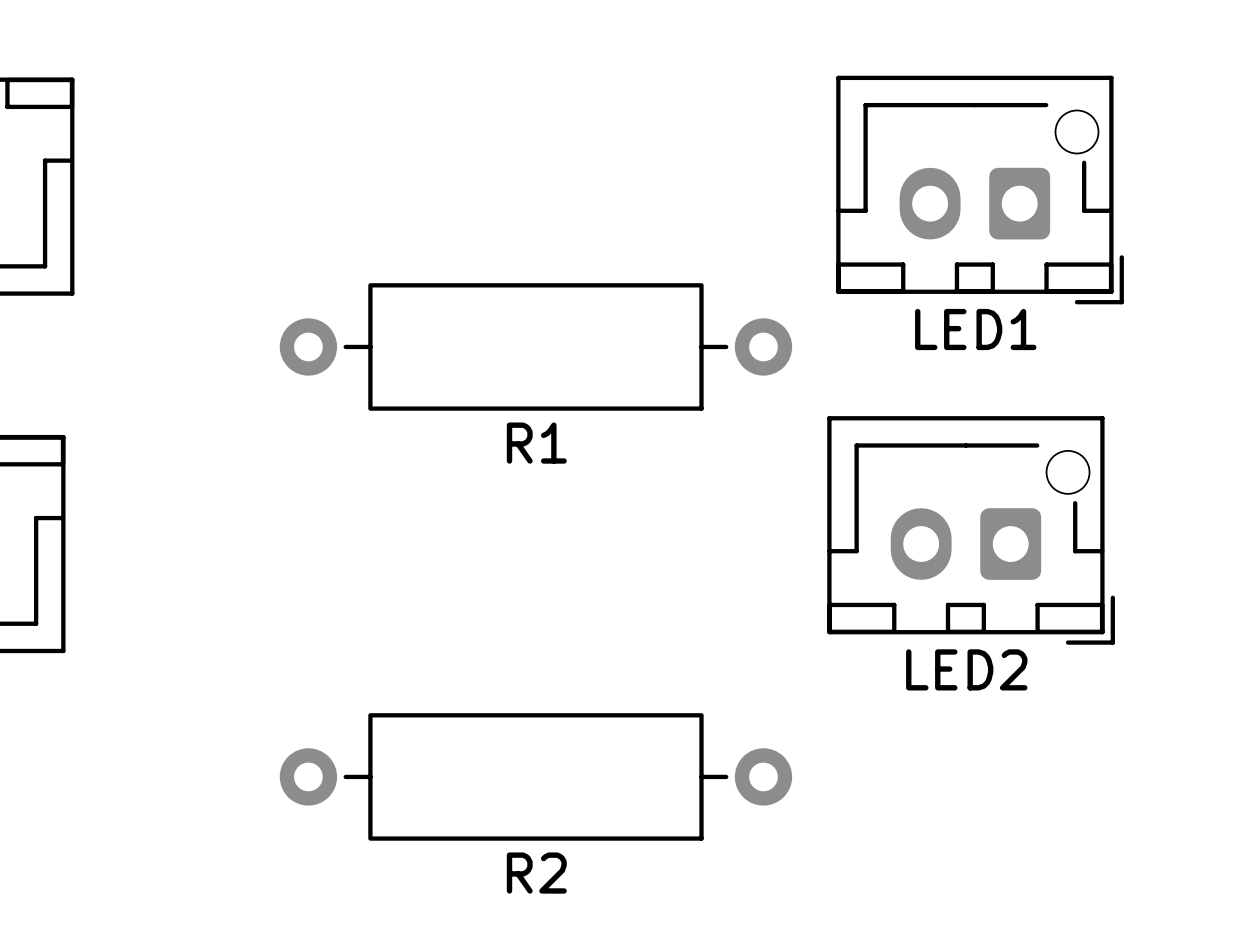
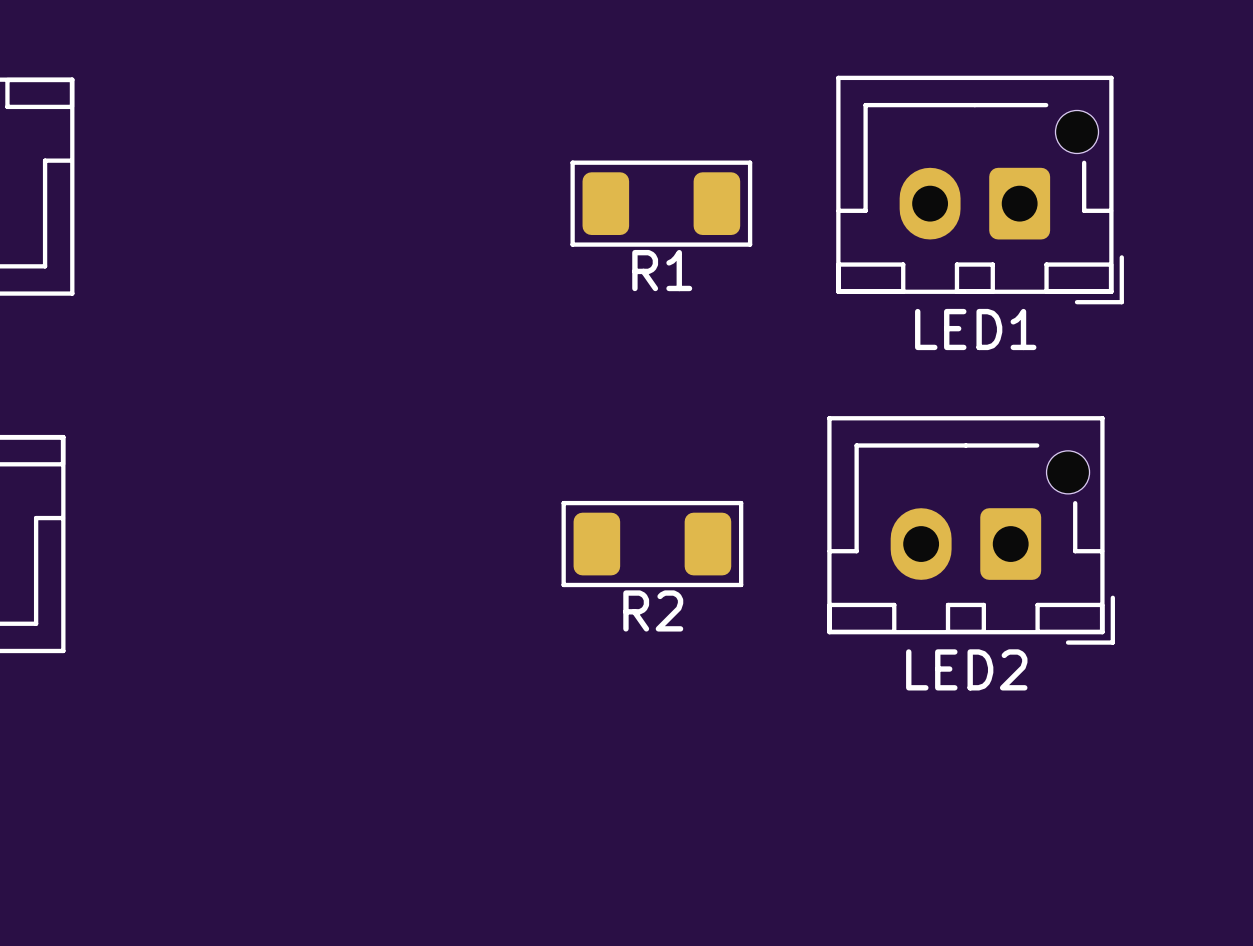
R1 footprint: [279, 283, 793, 411] -> [570, 160, 753, 247]
R2 footprint: [279, 713, 793, 841] -> [561, 500, 744, 588]

